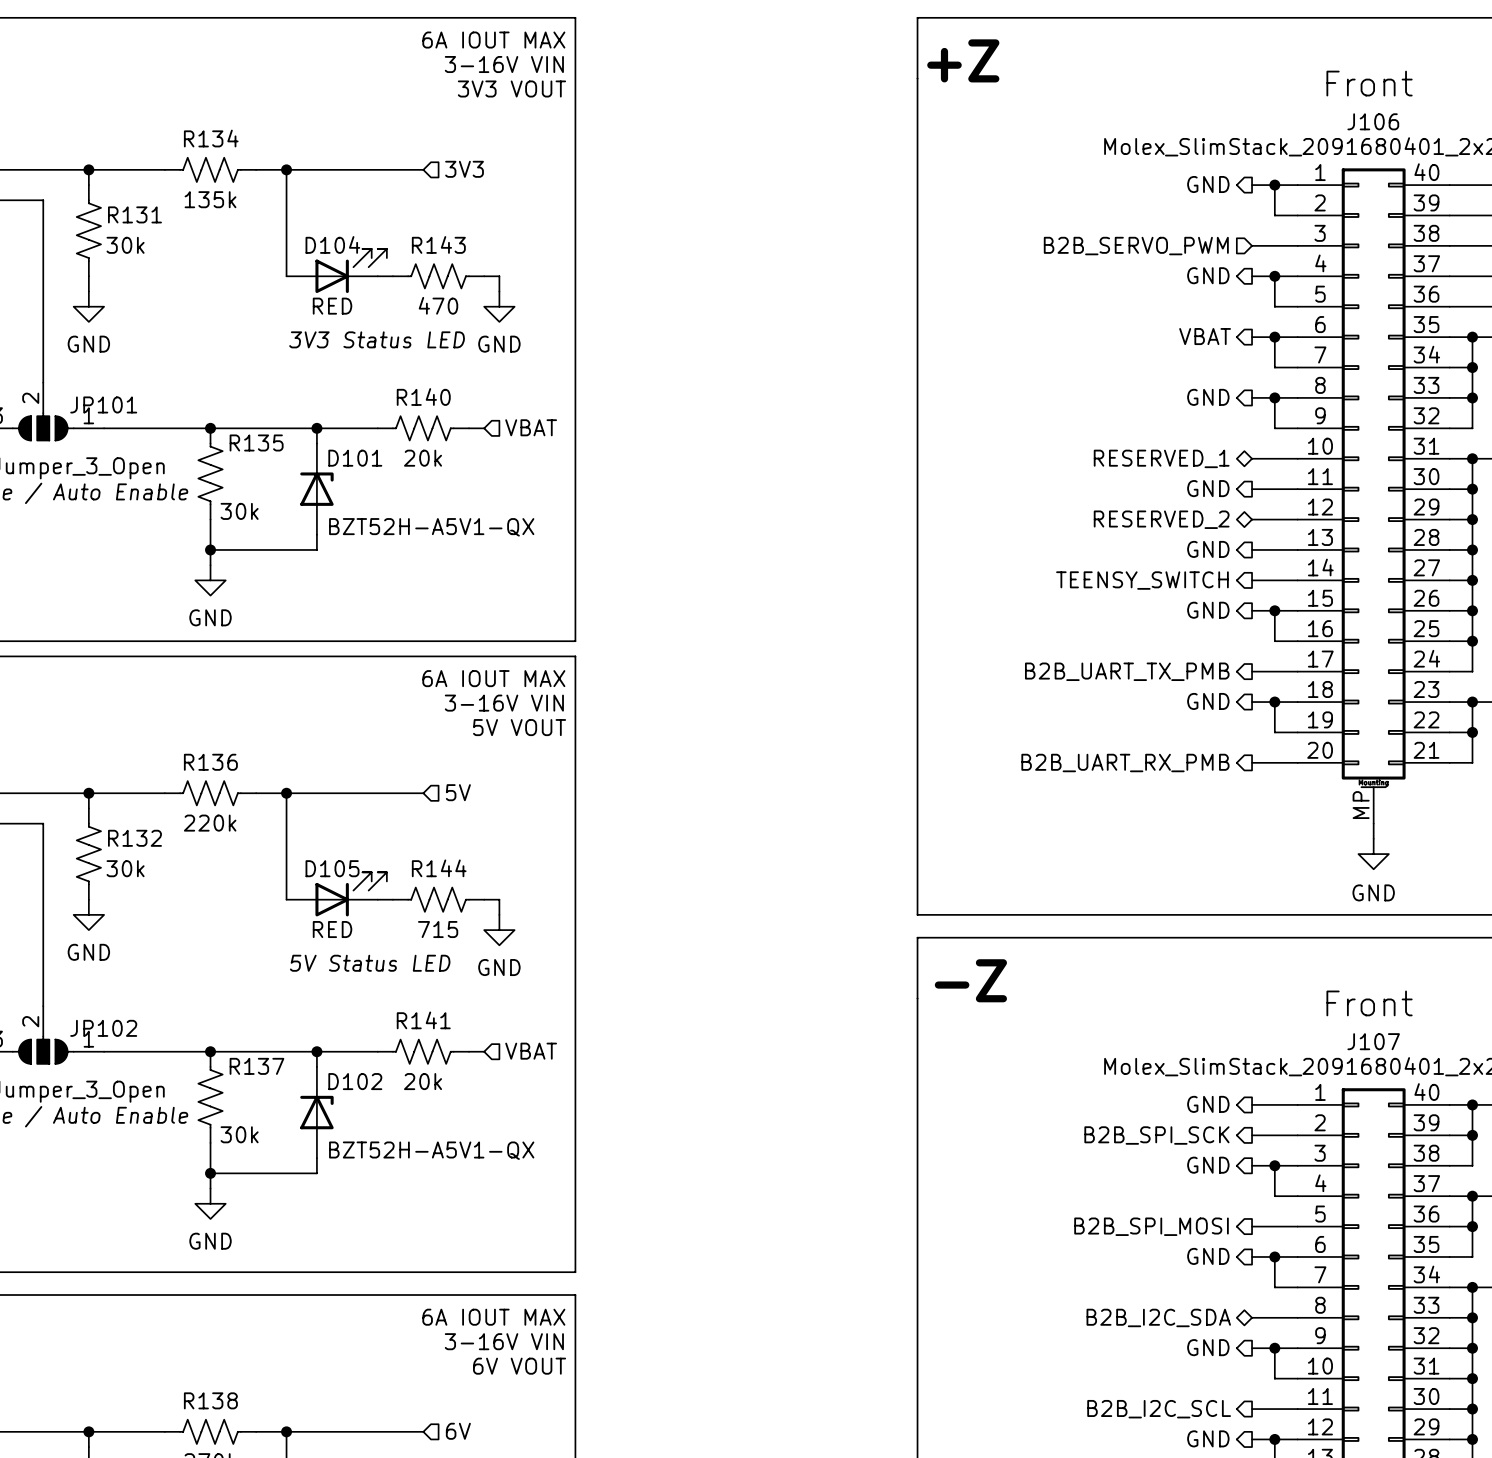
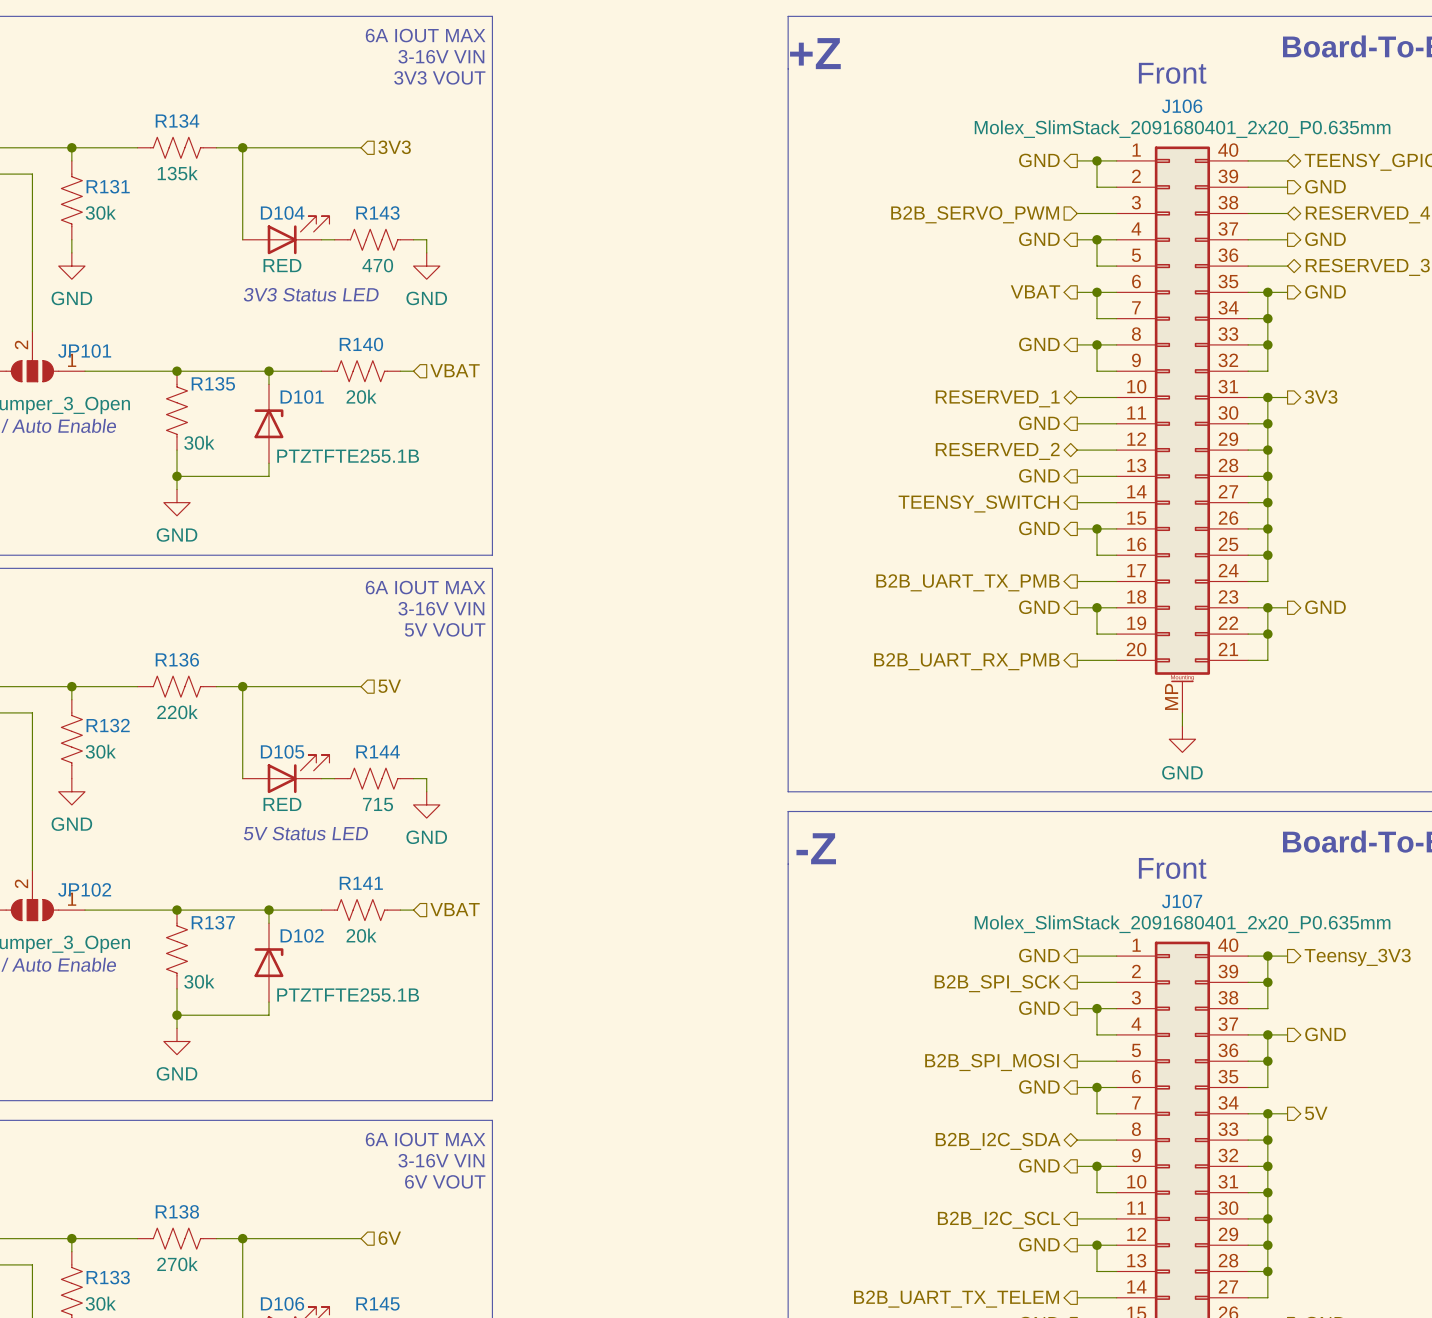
D101 value: BZT52H-A5V1-QX (431, 527) -> PTZTFTE255.1B (348, 456)
D102 value: BZT52H-A5V1-QX (431, 1150) -> PTZTFTE255.1B (348, 995)

